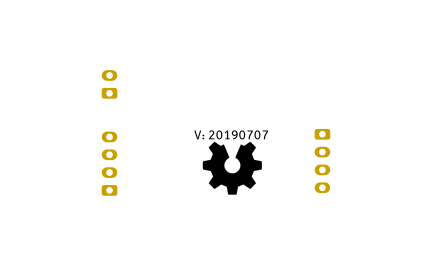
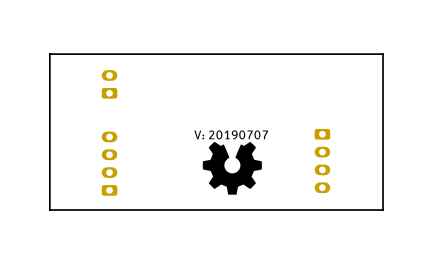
board edge: none -> (383, 54) (383, 210) (49, 210) (49, 54) (383, 54)

